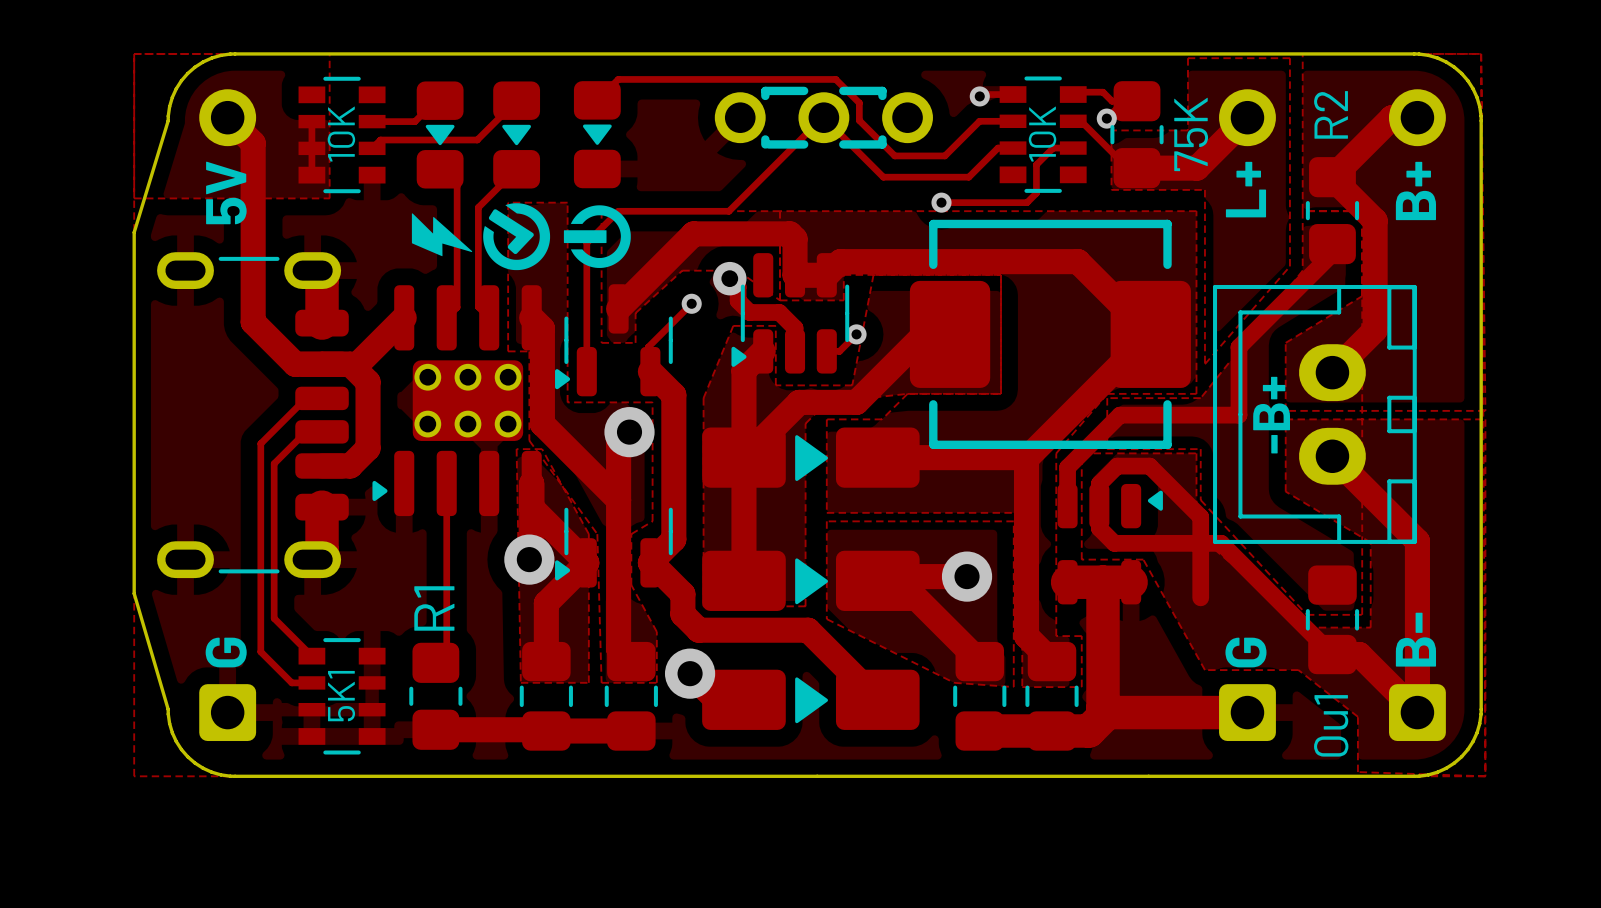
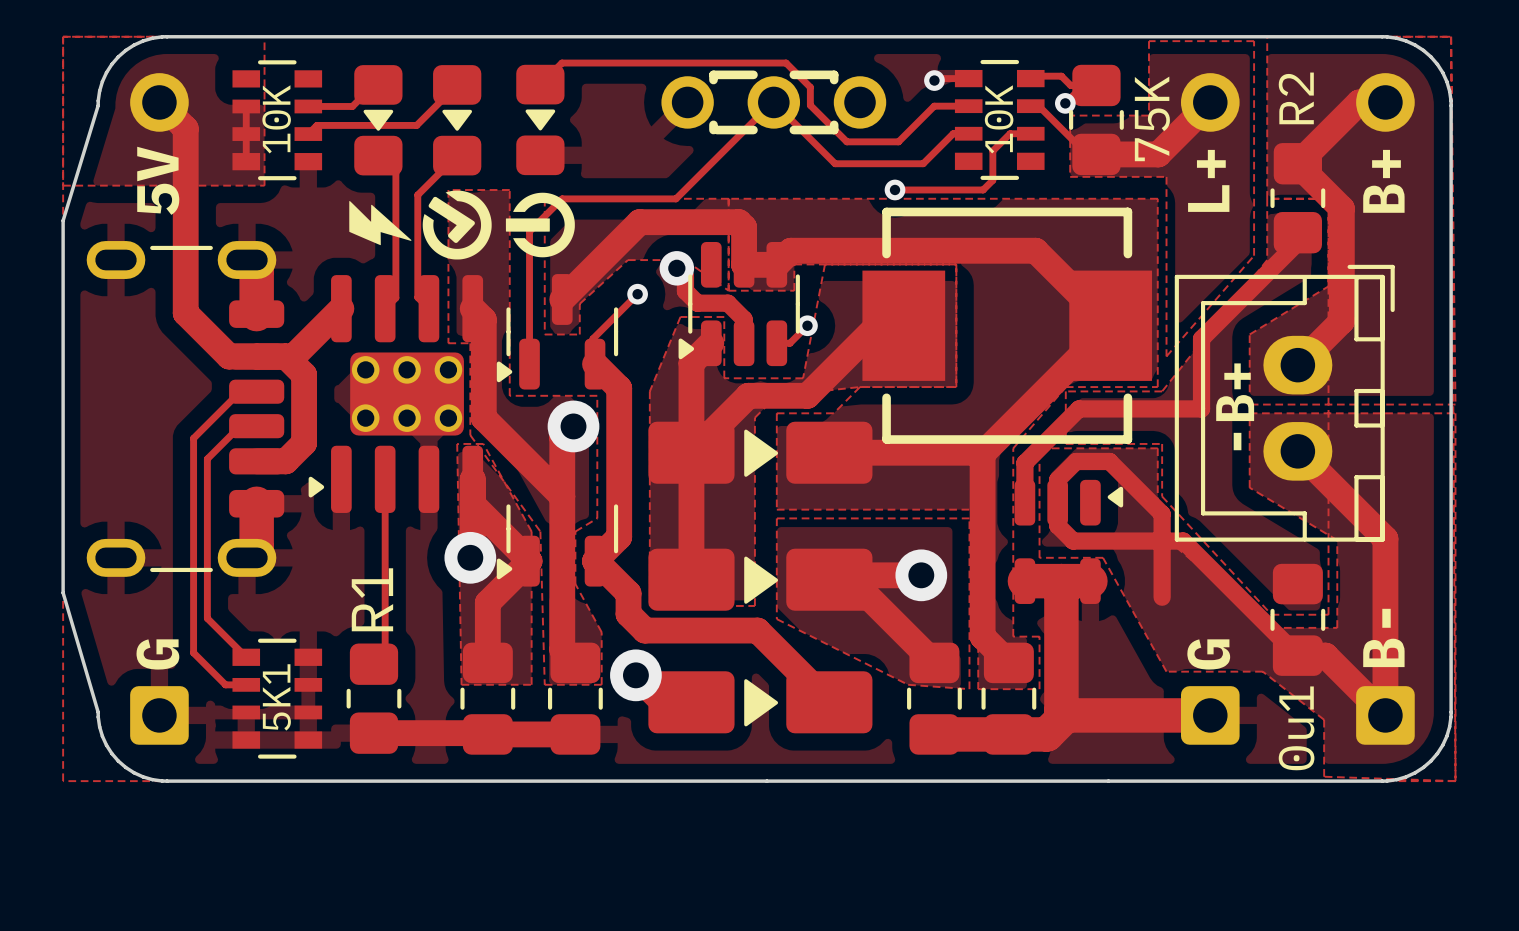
part footprint: [909, 219, 1191, 449] -> [862, 207, 1153, 444]
part footprint: [1213, 284, 1417, 544] -> [1174, 264, 1395, 542]

